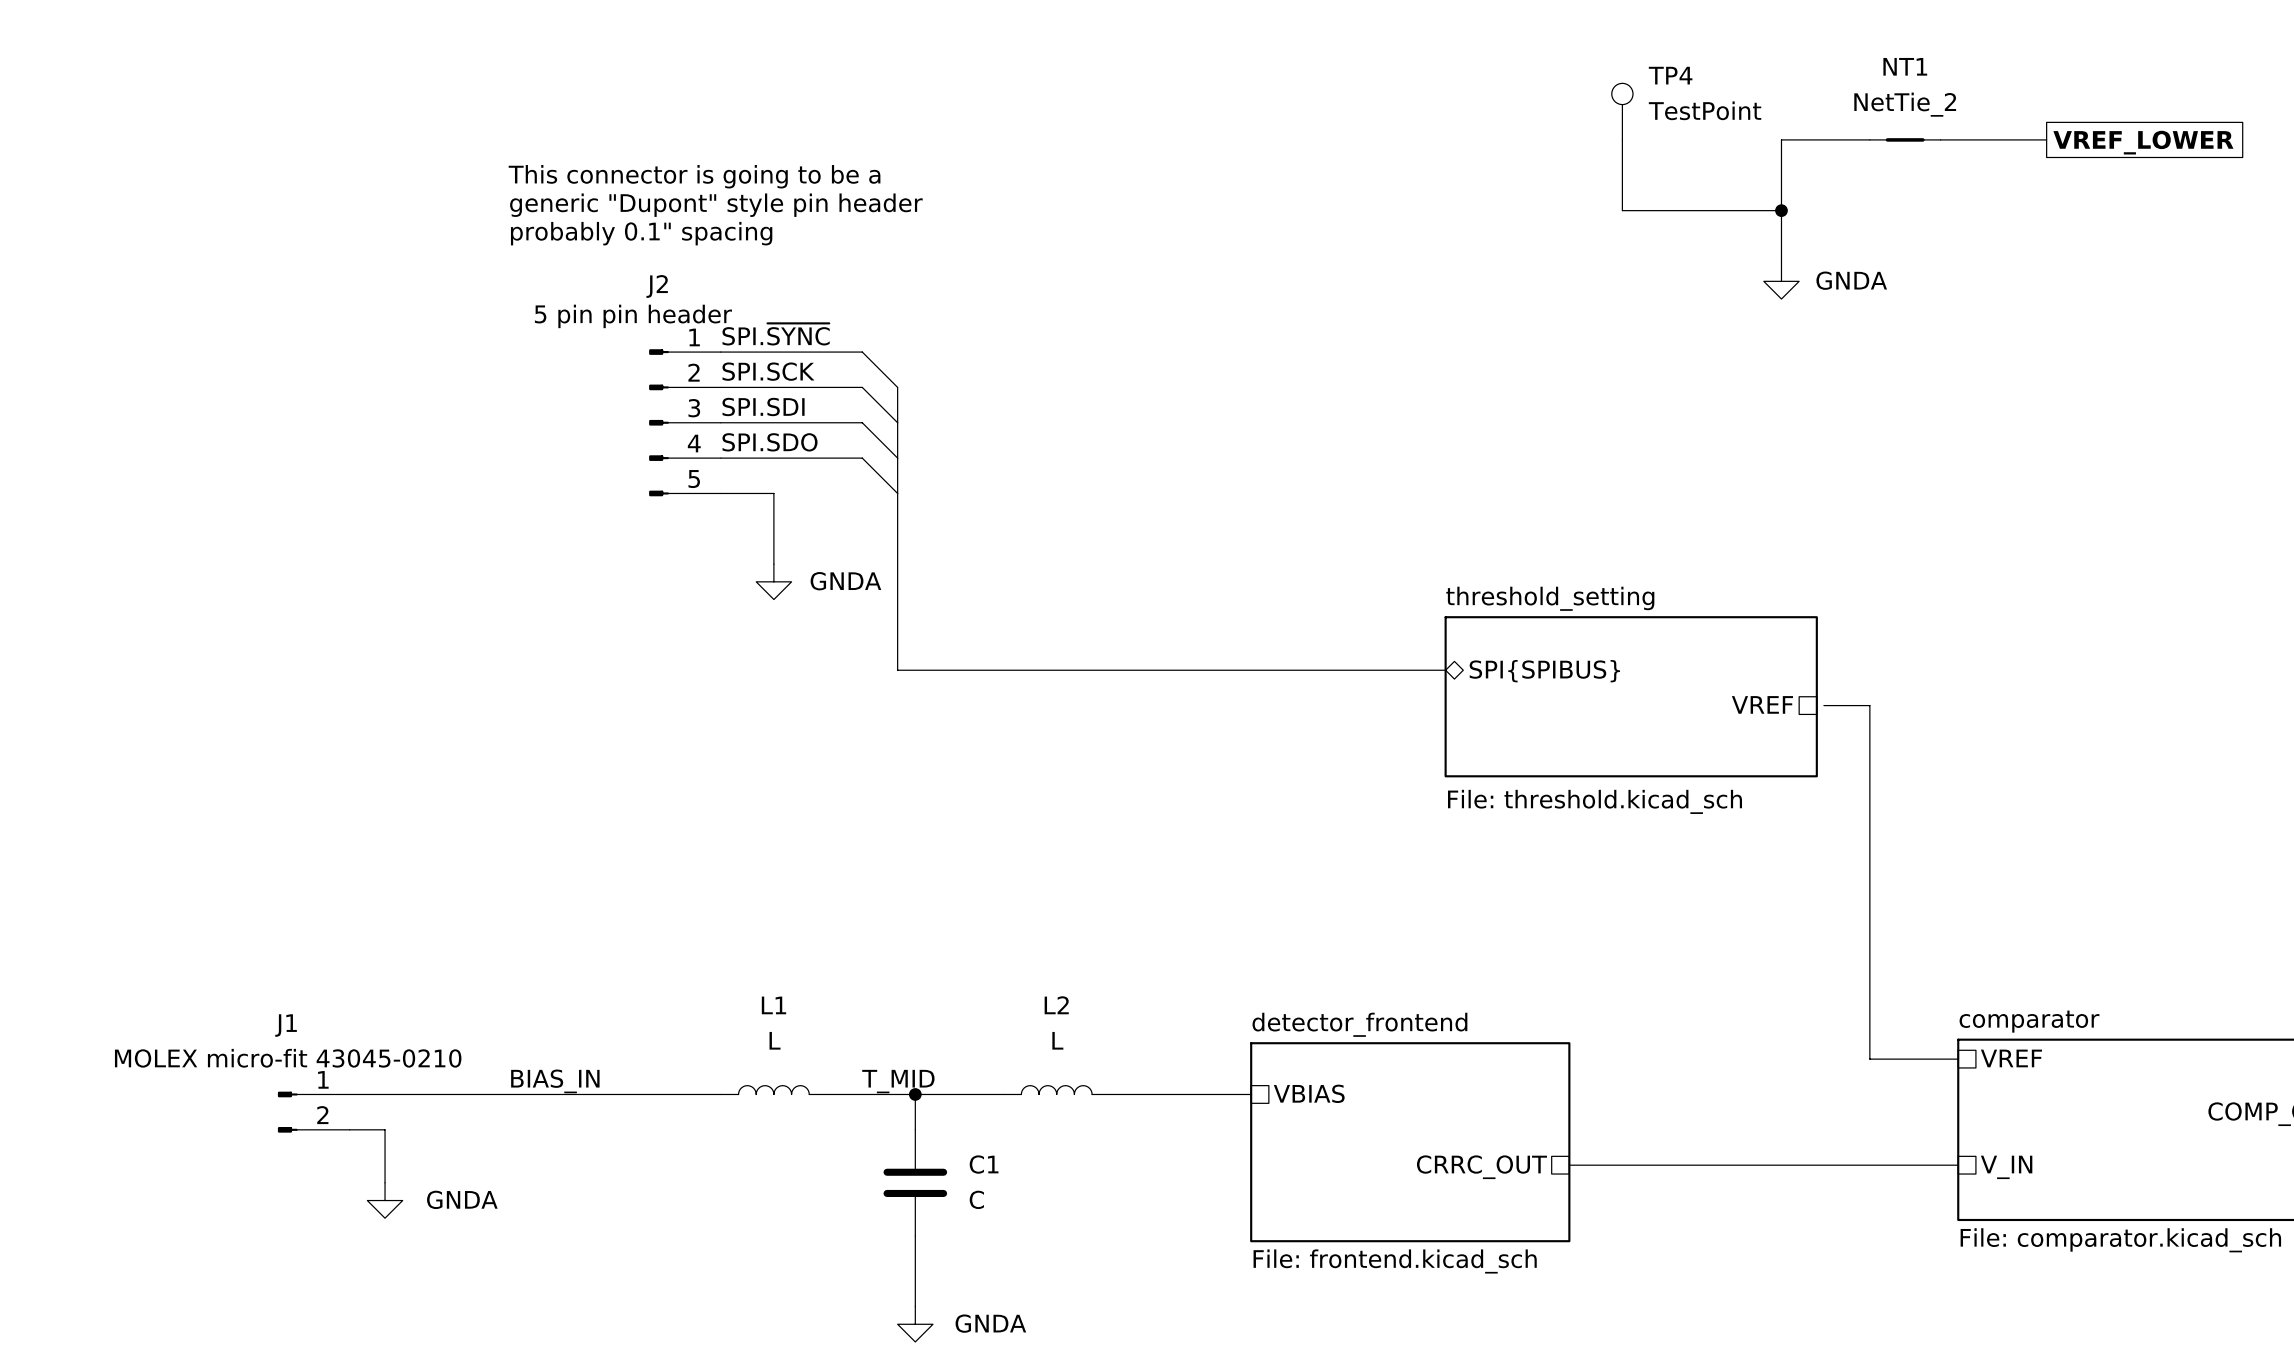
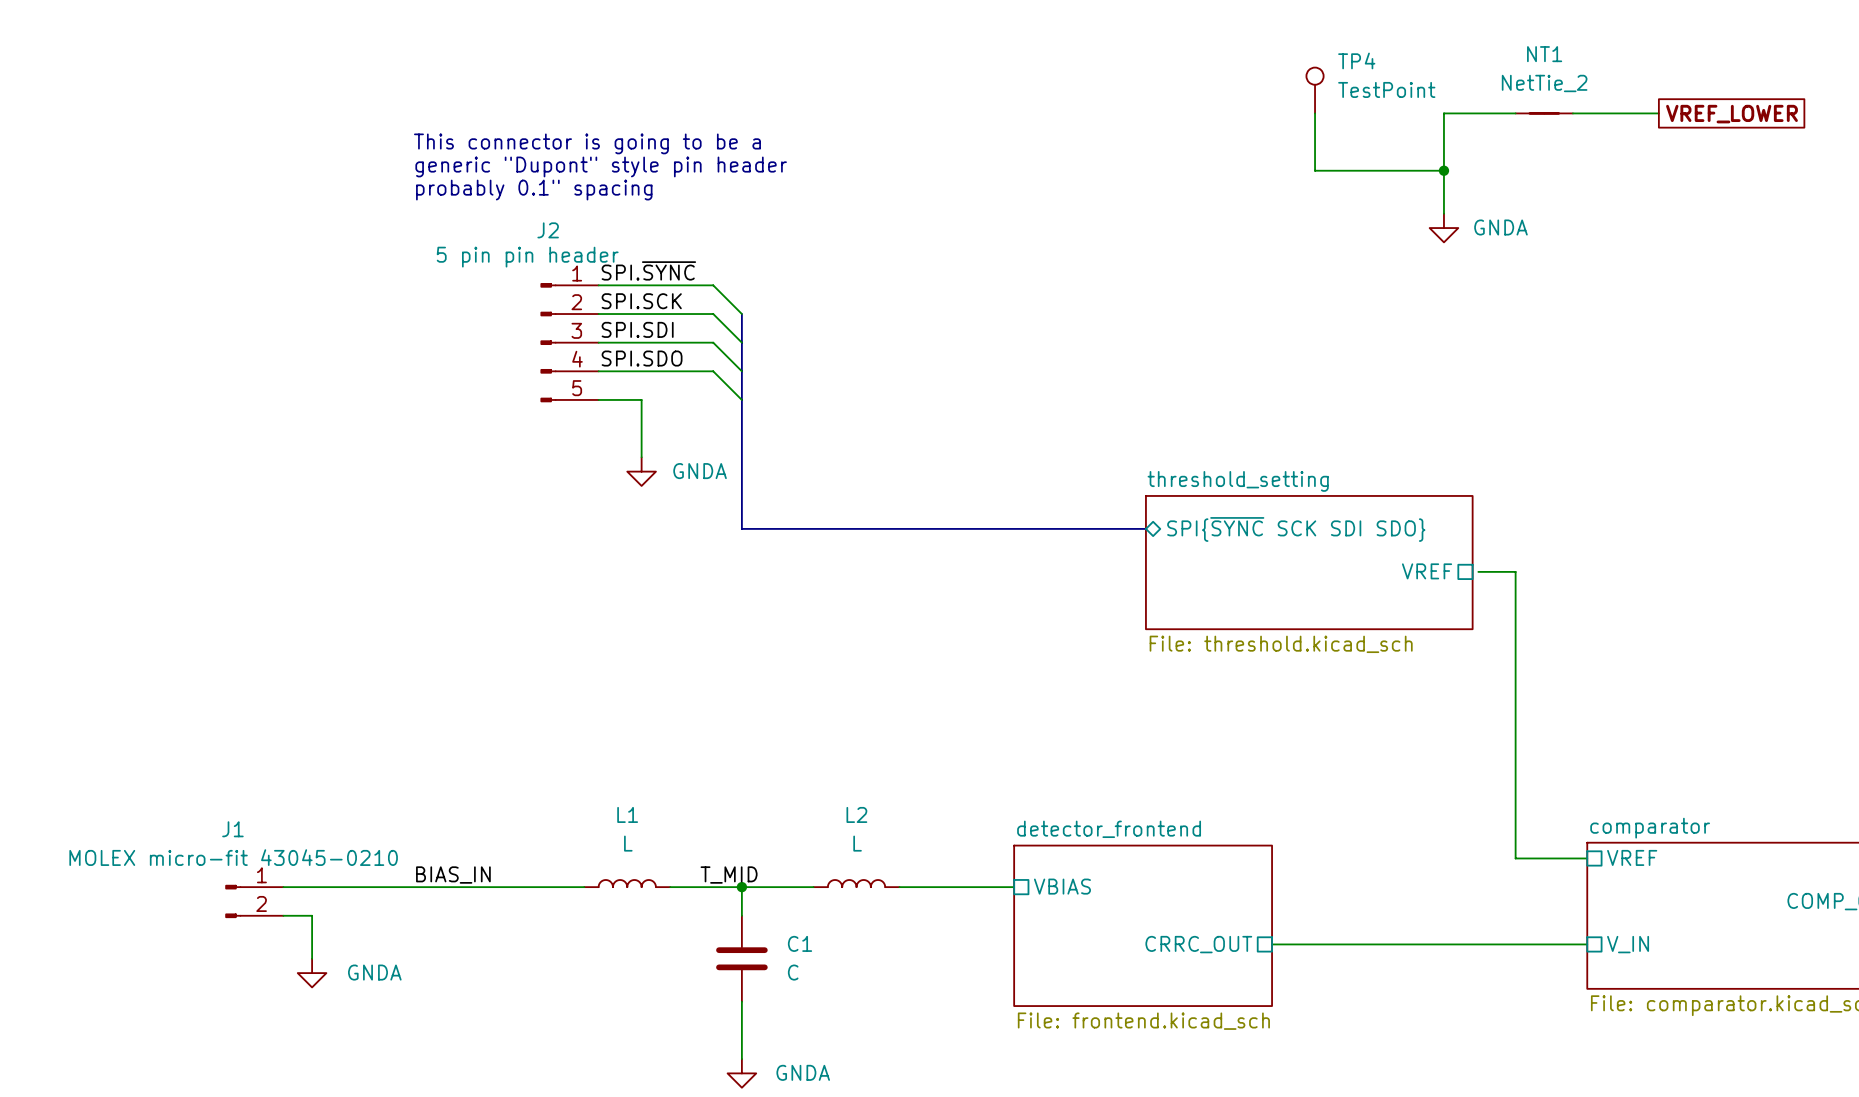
label position: SPI.~{SYNC} (776, 334) -> SPI.~{SYNC} (648, 270)
wire: (862, 352) (897, 387) -> (698, 285) (713, 285) (741, 314)
label position: SPI.SCK (768, 371) -> SPI.SCK (641, 301)
wire: (862, 387) (897, 422) -> (698, 314) (713, 314) (741, 342)
bus: (897, 387) (897, 670) (1445, 670) -> none
bus: none -> (741, 314) (741, 528) (1145, 528)
label position: SPI.SDI (763, 407) -> SPI.SDI (637, 329)
J2 position: (684, 422) -> (569, 342)
wire: (862, 422) (897, 458) -> (698, 342) (713, 342) (741, 371)
label position: SPI.SDO (770, 442) -> SPI.SDO (642, 358)
wire: (862, 458) (897, 493) -> (698, 371) (713, 371) (741, 399)
wire: (773, 493) (773, 564) -> (627, 399) (641, 399) (641, 457)
power symbol position: GNDA (773, 581) -> GNDA (641, 471)
sheet pin: none -> SPI{~{SYNC} SCK SDI SDO} (1296, 529)
sheet pin: SPI{SPIBUS} (1544, 671) -> none
sheet threshold_setting: none -> File: threshold.kicad_sch (1309, 562)
sheet threshold_setting: File: threshold.kicad_sch (1631, 696) -> none

